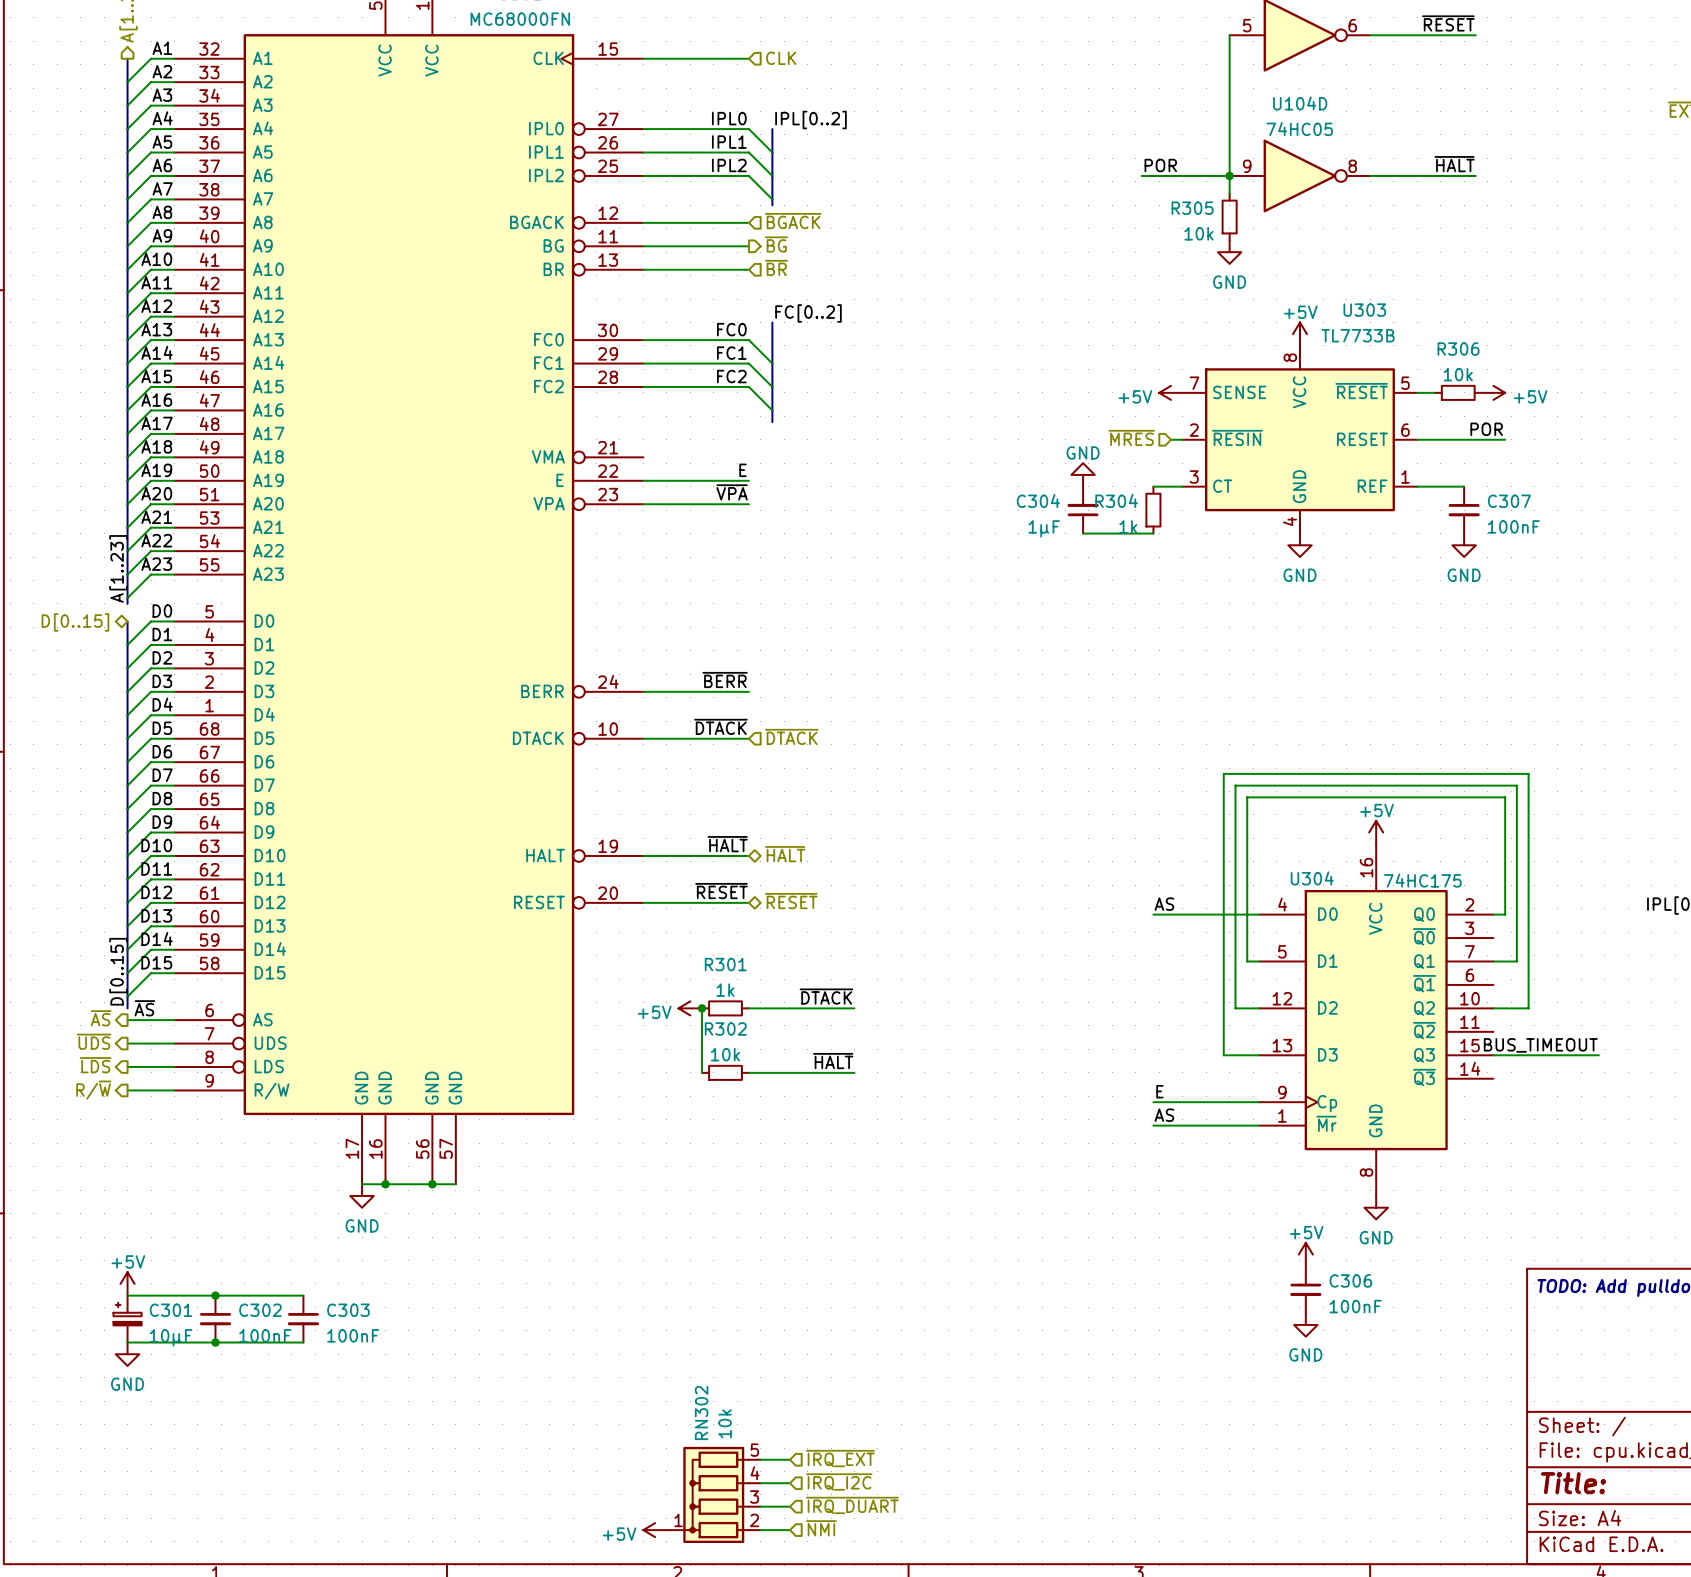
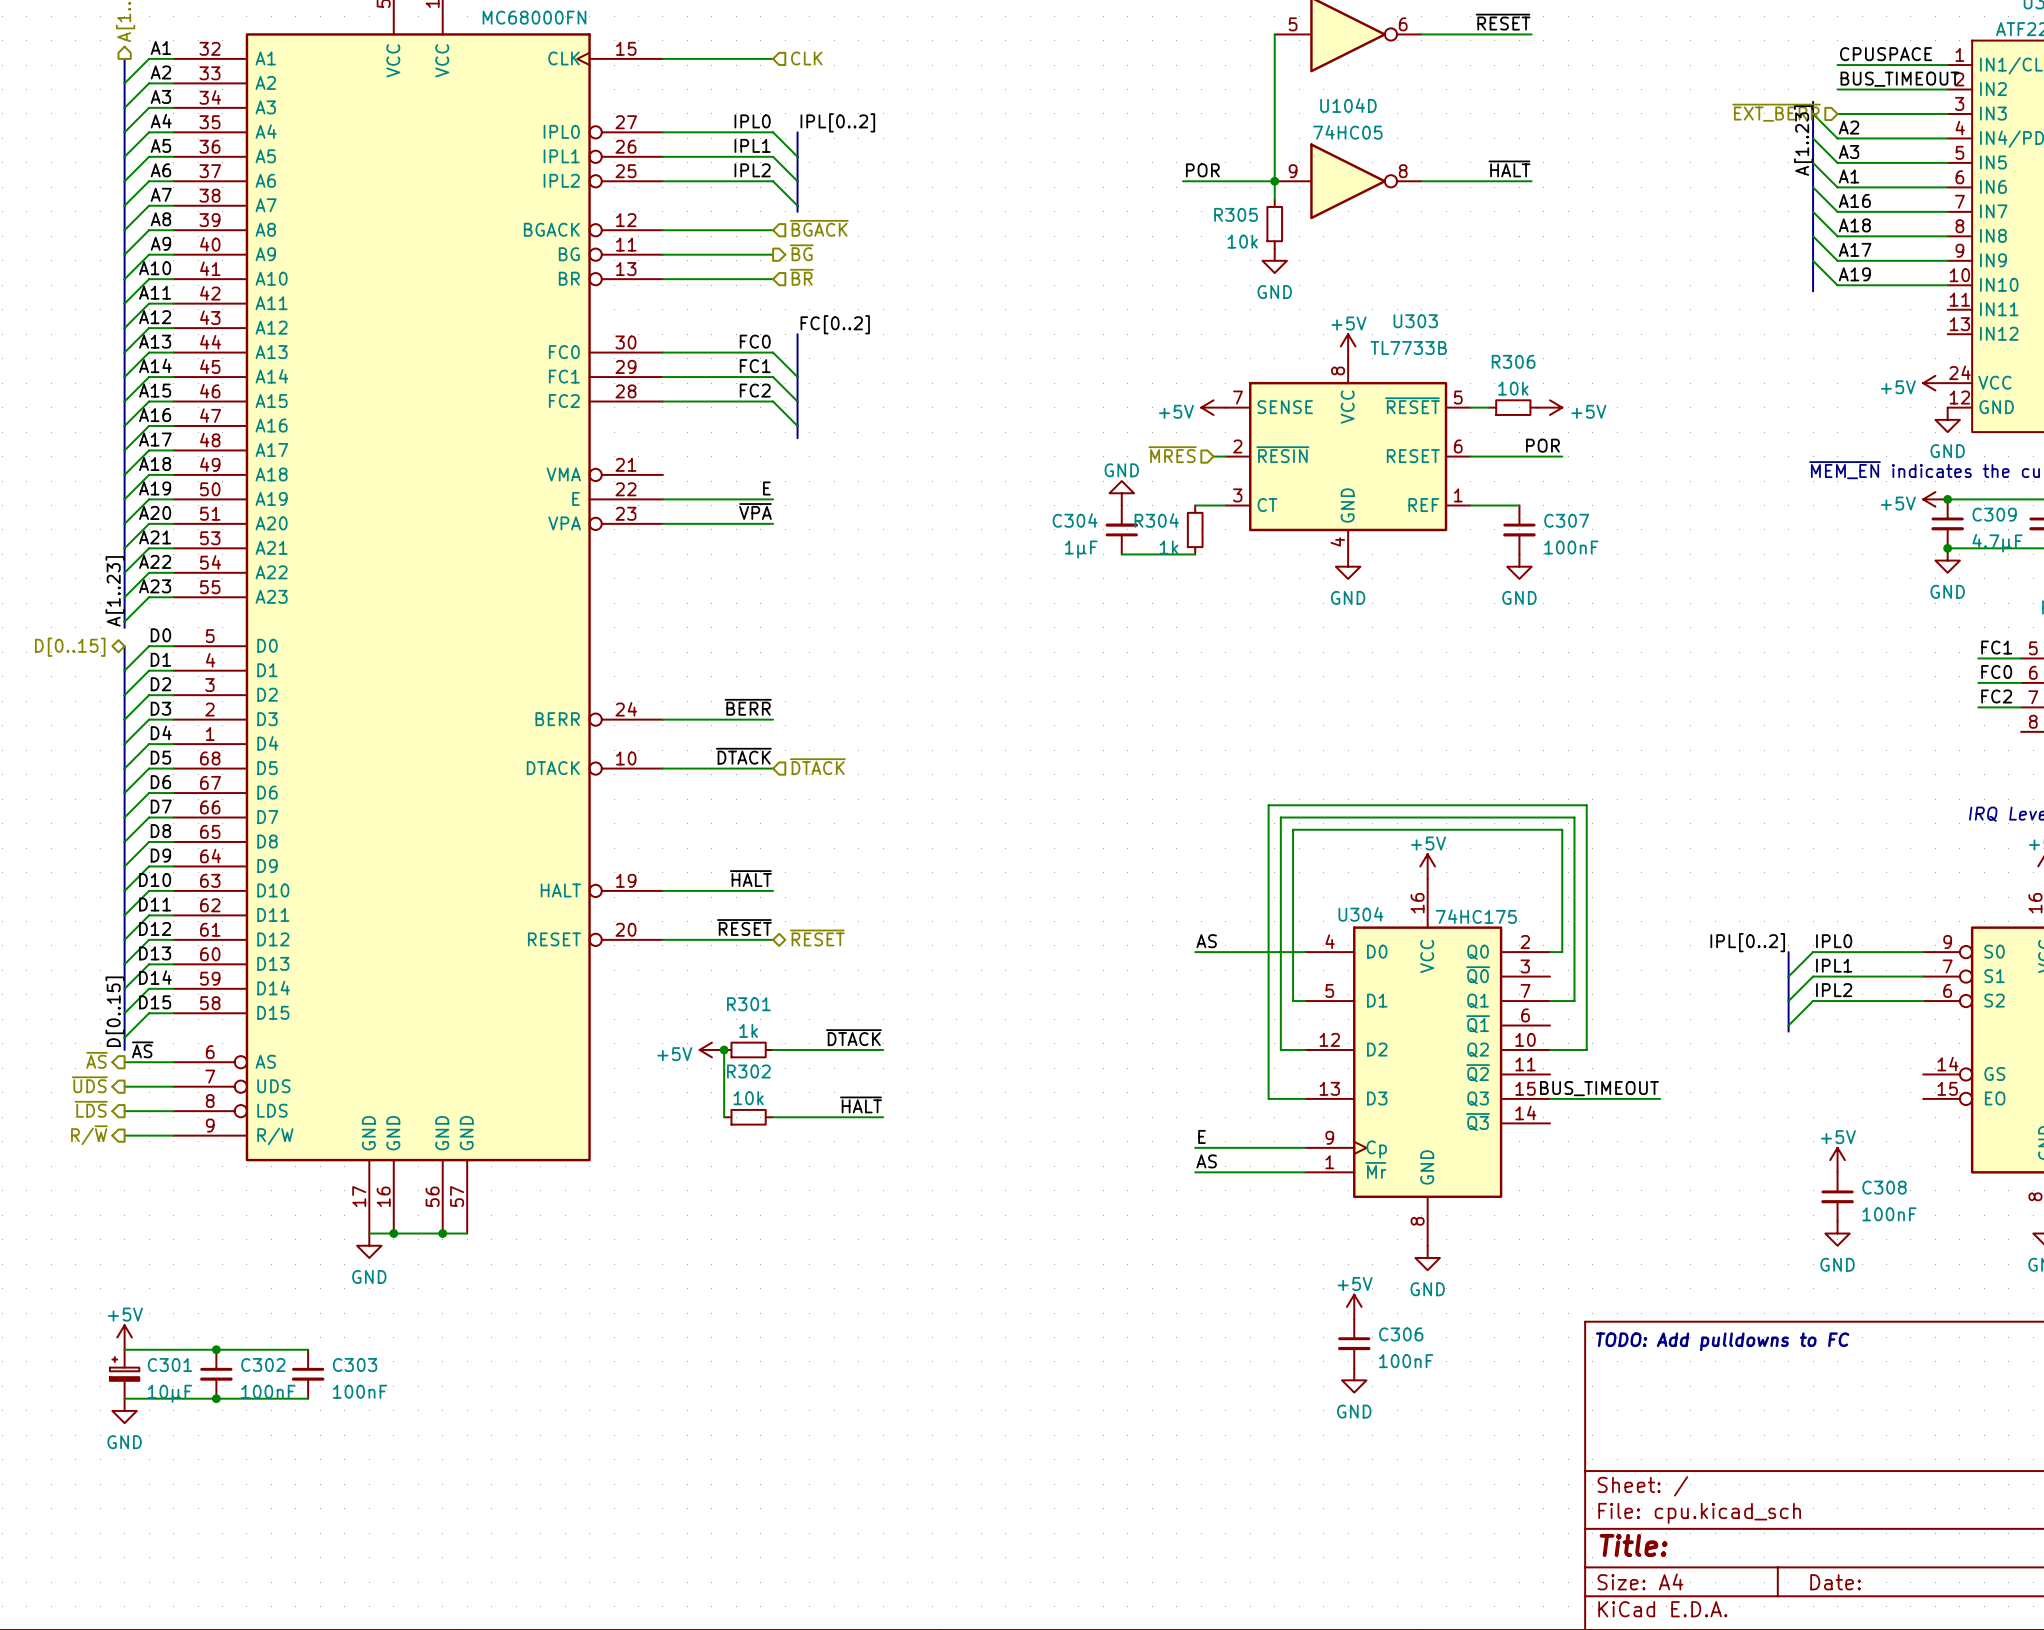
hierarchical label: ~{HALT} (785, 854) -> none
hierarchical label: ~{IRQ_EXT} (840, 1458) -> none
wire: (760, 1459) (789, 1459) -> none
hierarchical label: ~{IRQ_I2C} (839, 1481) -> none
wire: (760, 1483) (789, 1483) -> none
RN302: 10k (713, 1494) -> none
hierarchical label: ~{IRQ_DUART} (852, 1505) -> none
wire: (760, 1506) (789, 1506) -> none
hierarchical label: ~{NMI} (821, 1528) -> none
power symbol: +5V (655, 1530) -> none
wire: (760, 1530) (789, 1530) -> none

